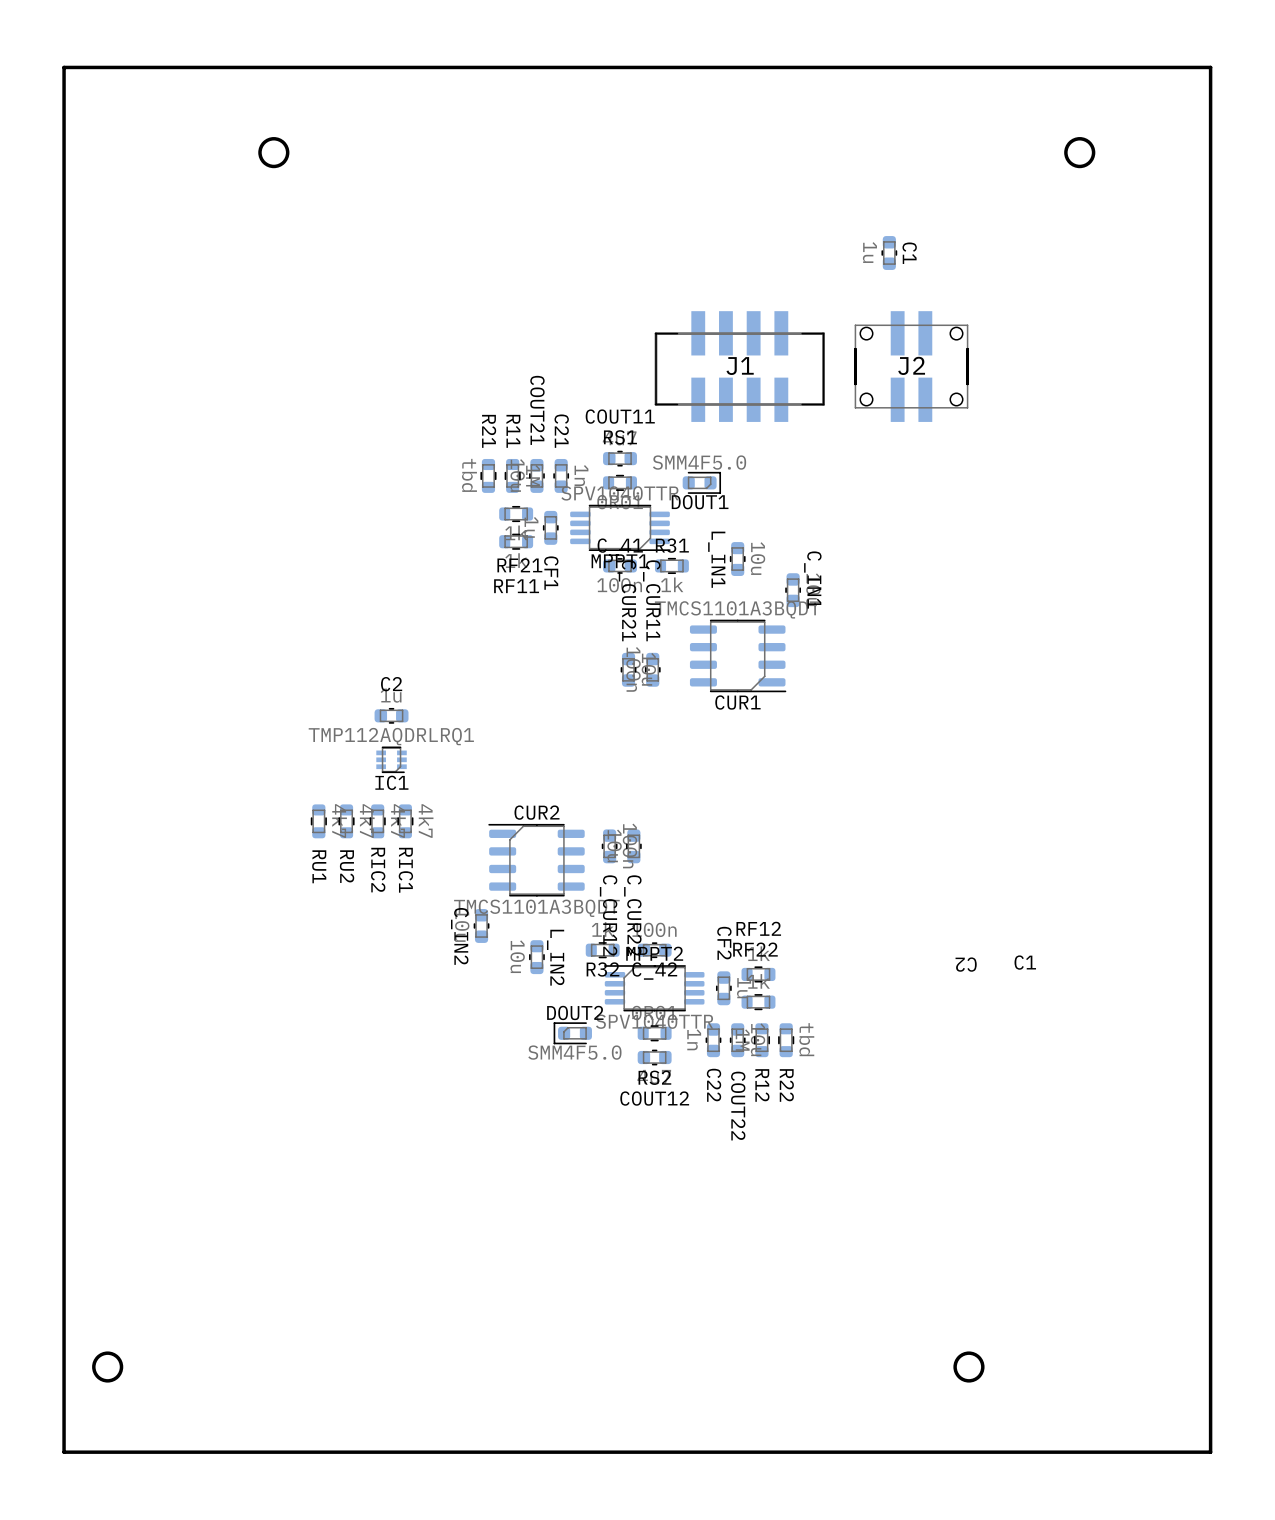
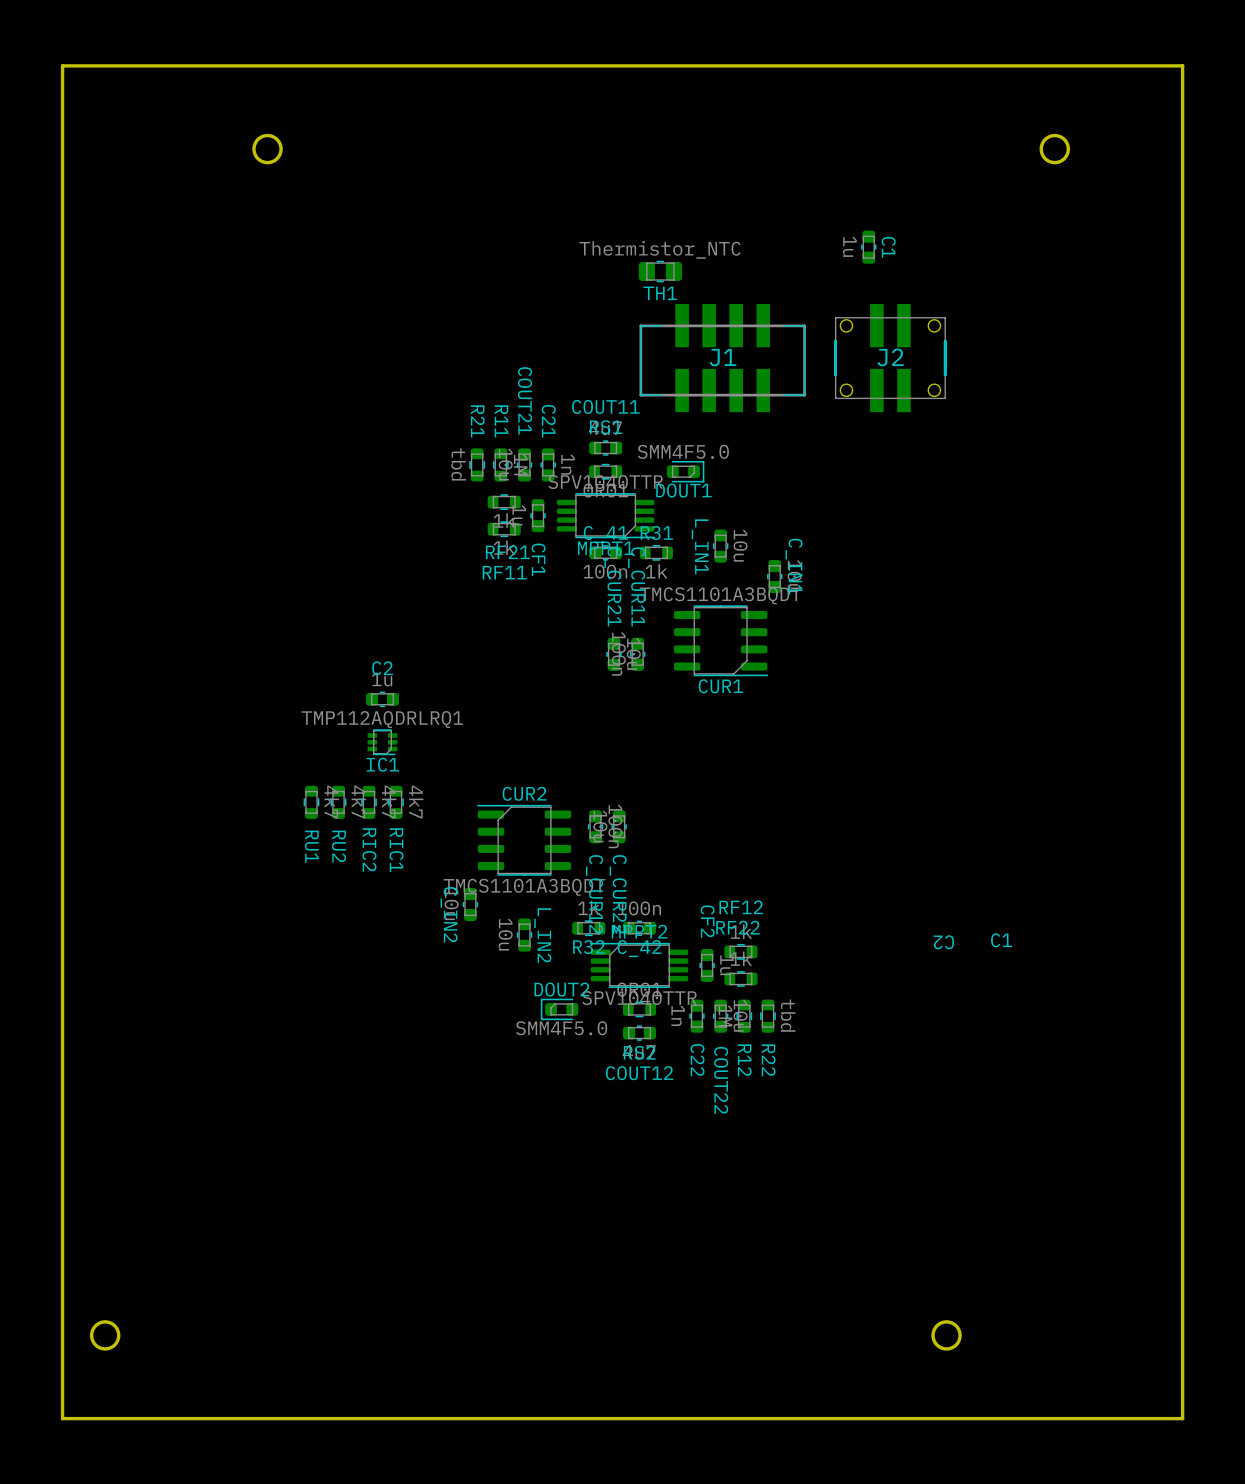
TH1: none -> Thermistor_NTC (660, 271)

